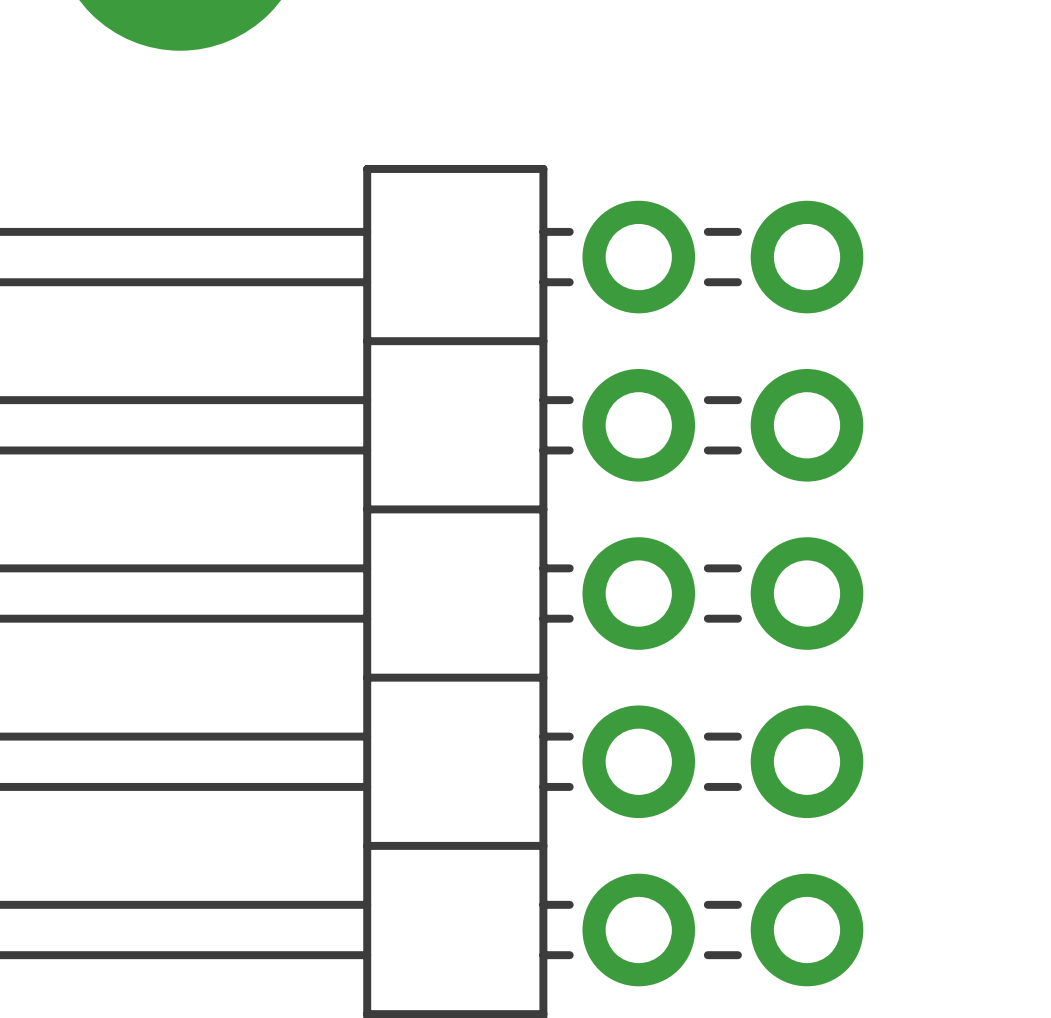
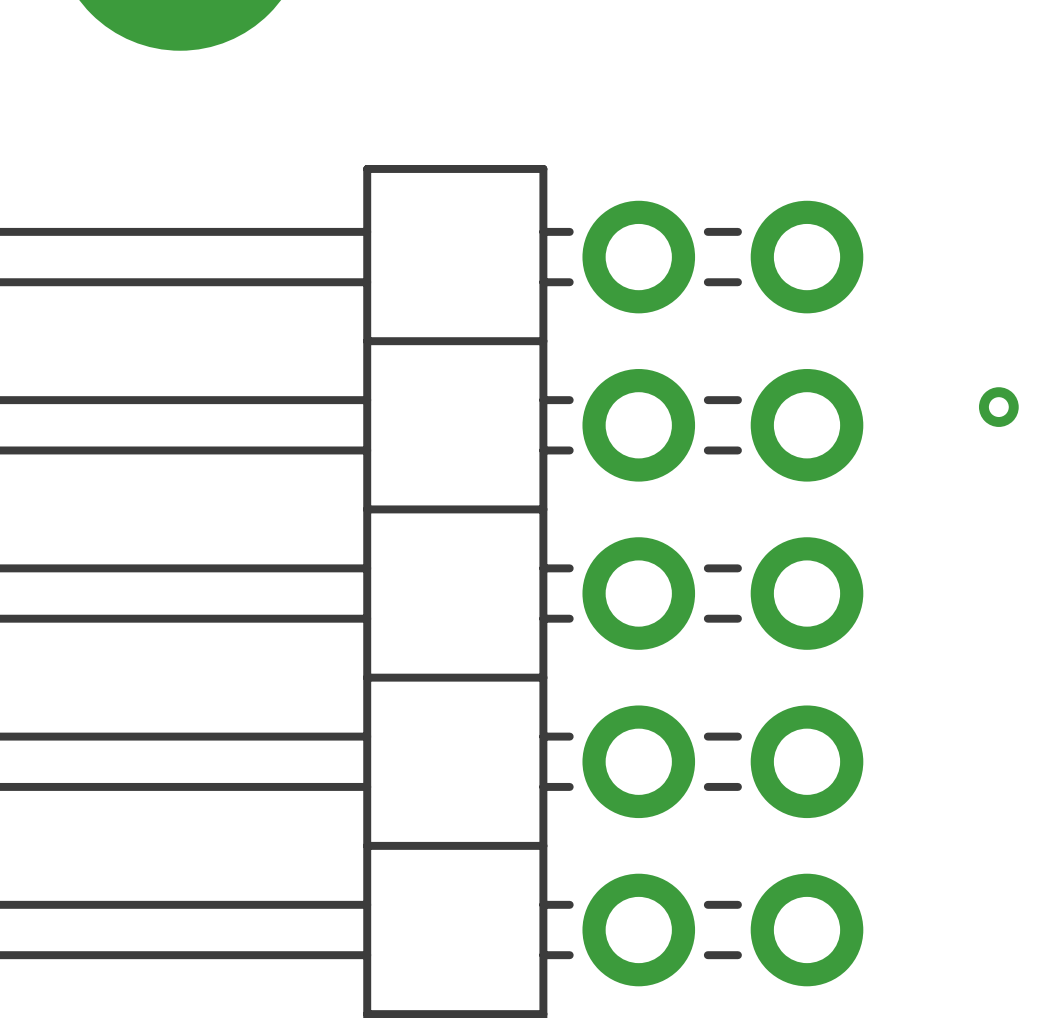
via: none -> (998, 407)

